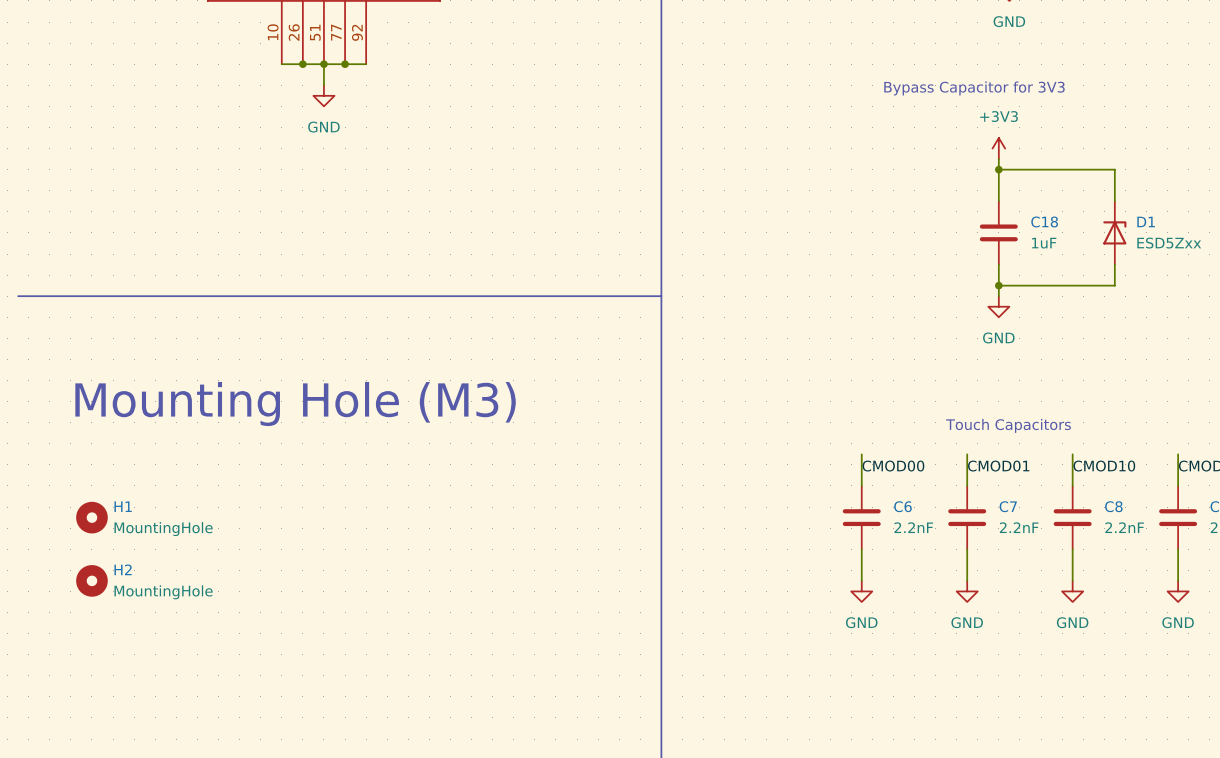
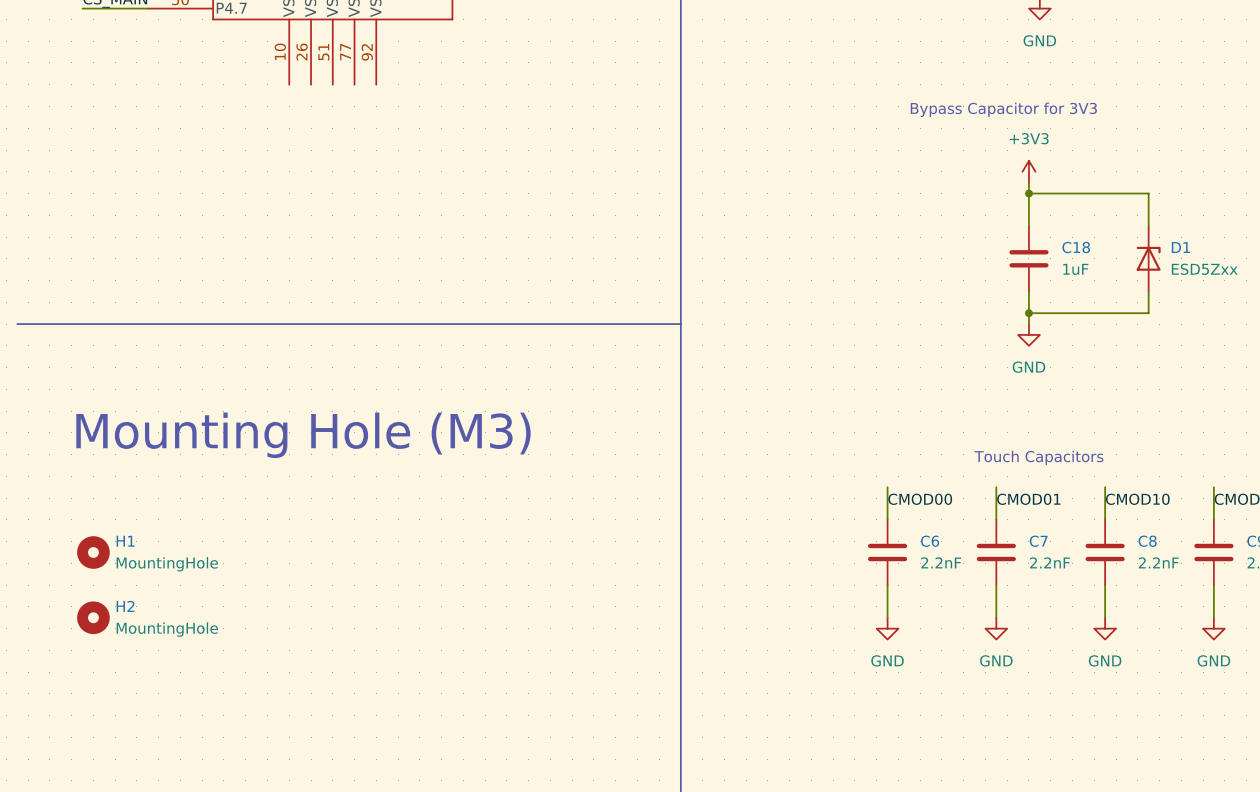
wire: (281, 64) (366, 64) -> none
junction: (302, 64) -> none
wire: (323, 64) (323, 85) -> none
junction: (323, 64) -> none
junction: (345, 64) -> none
power symbol: GND (323, 95) -> none

